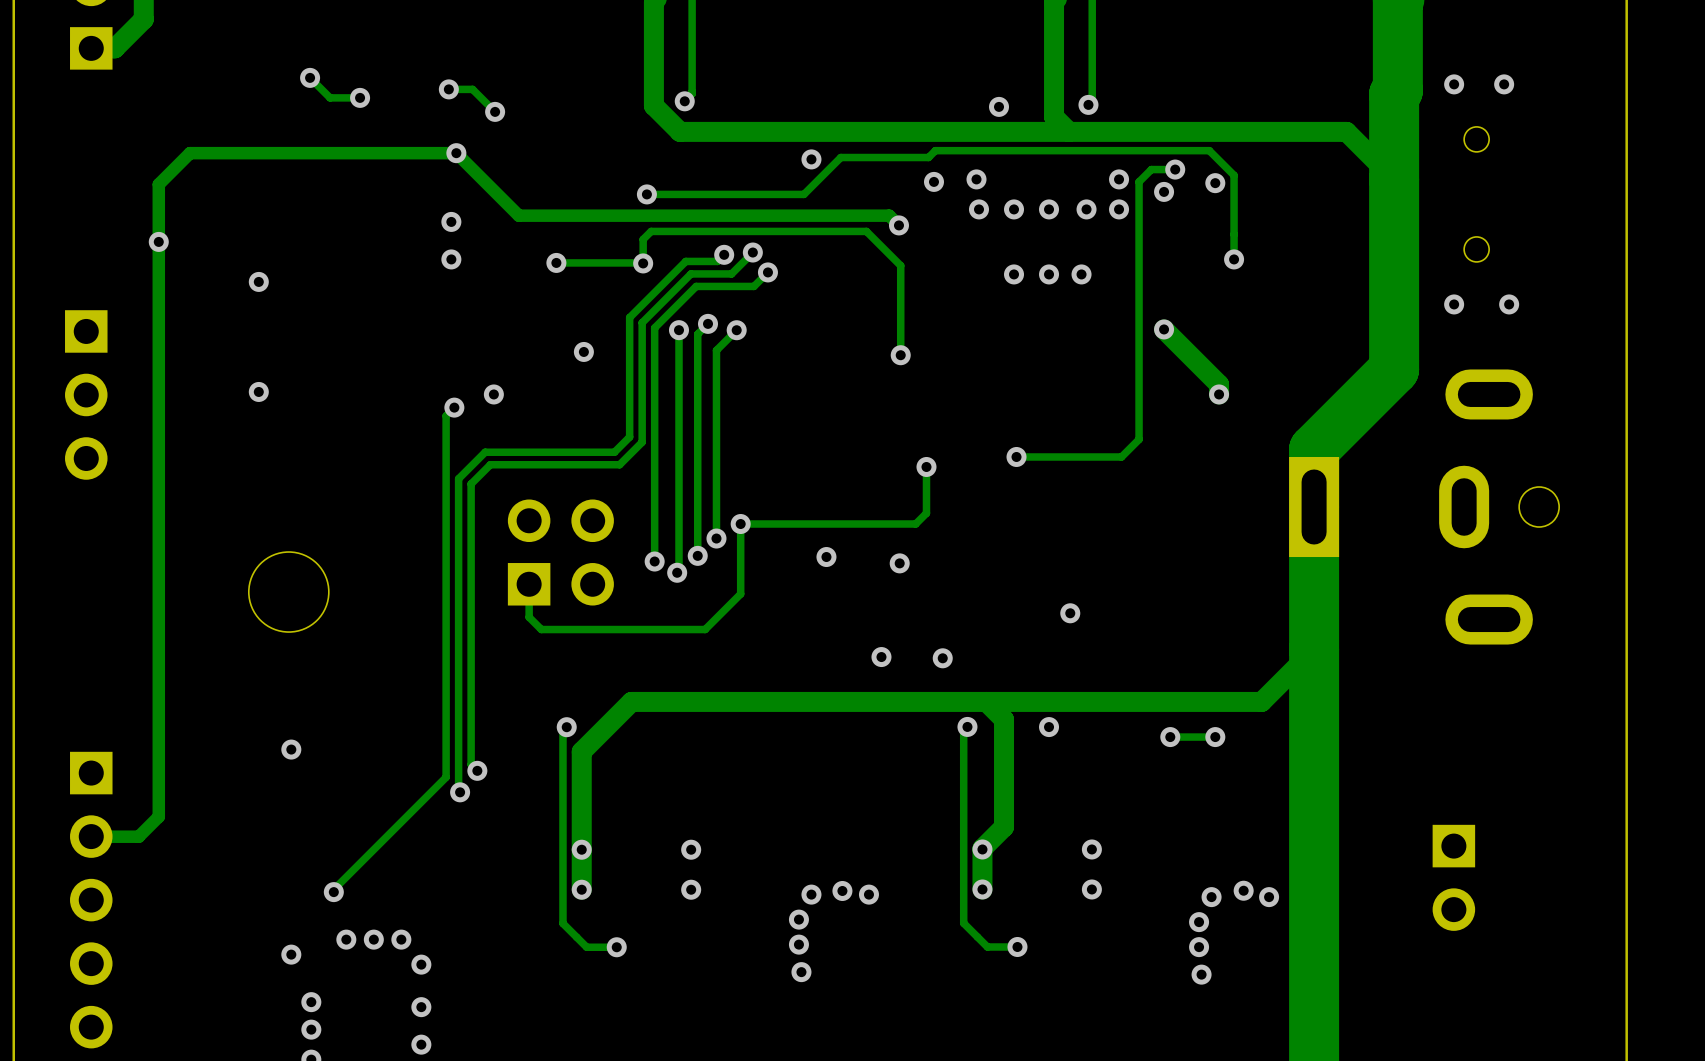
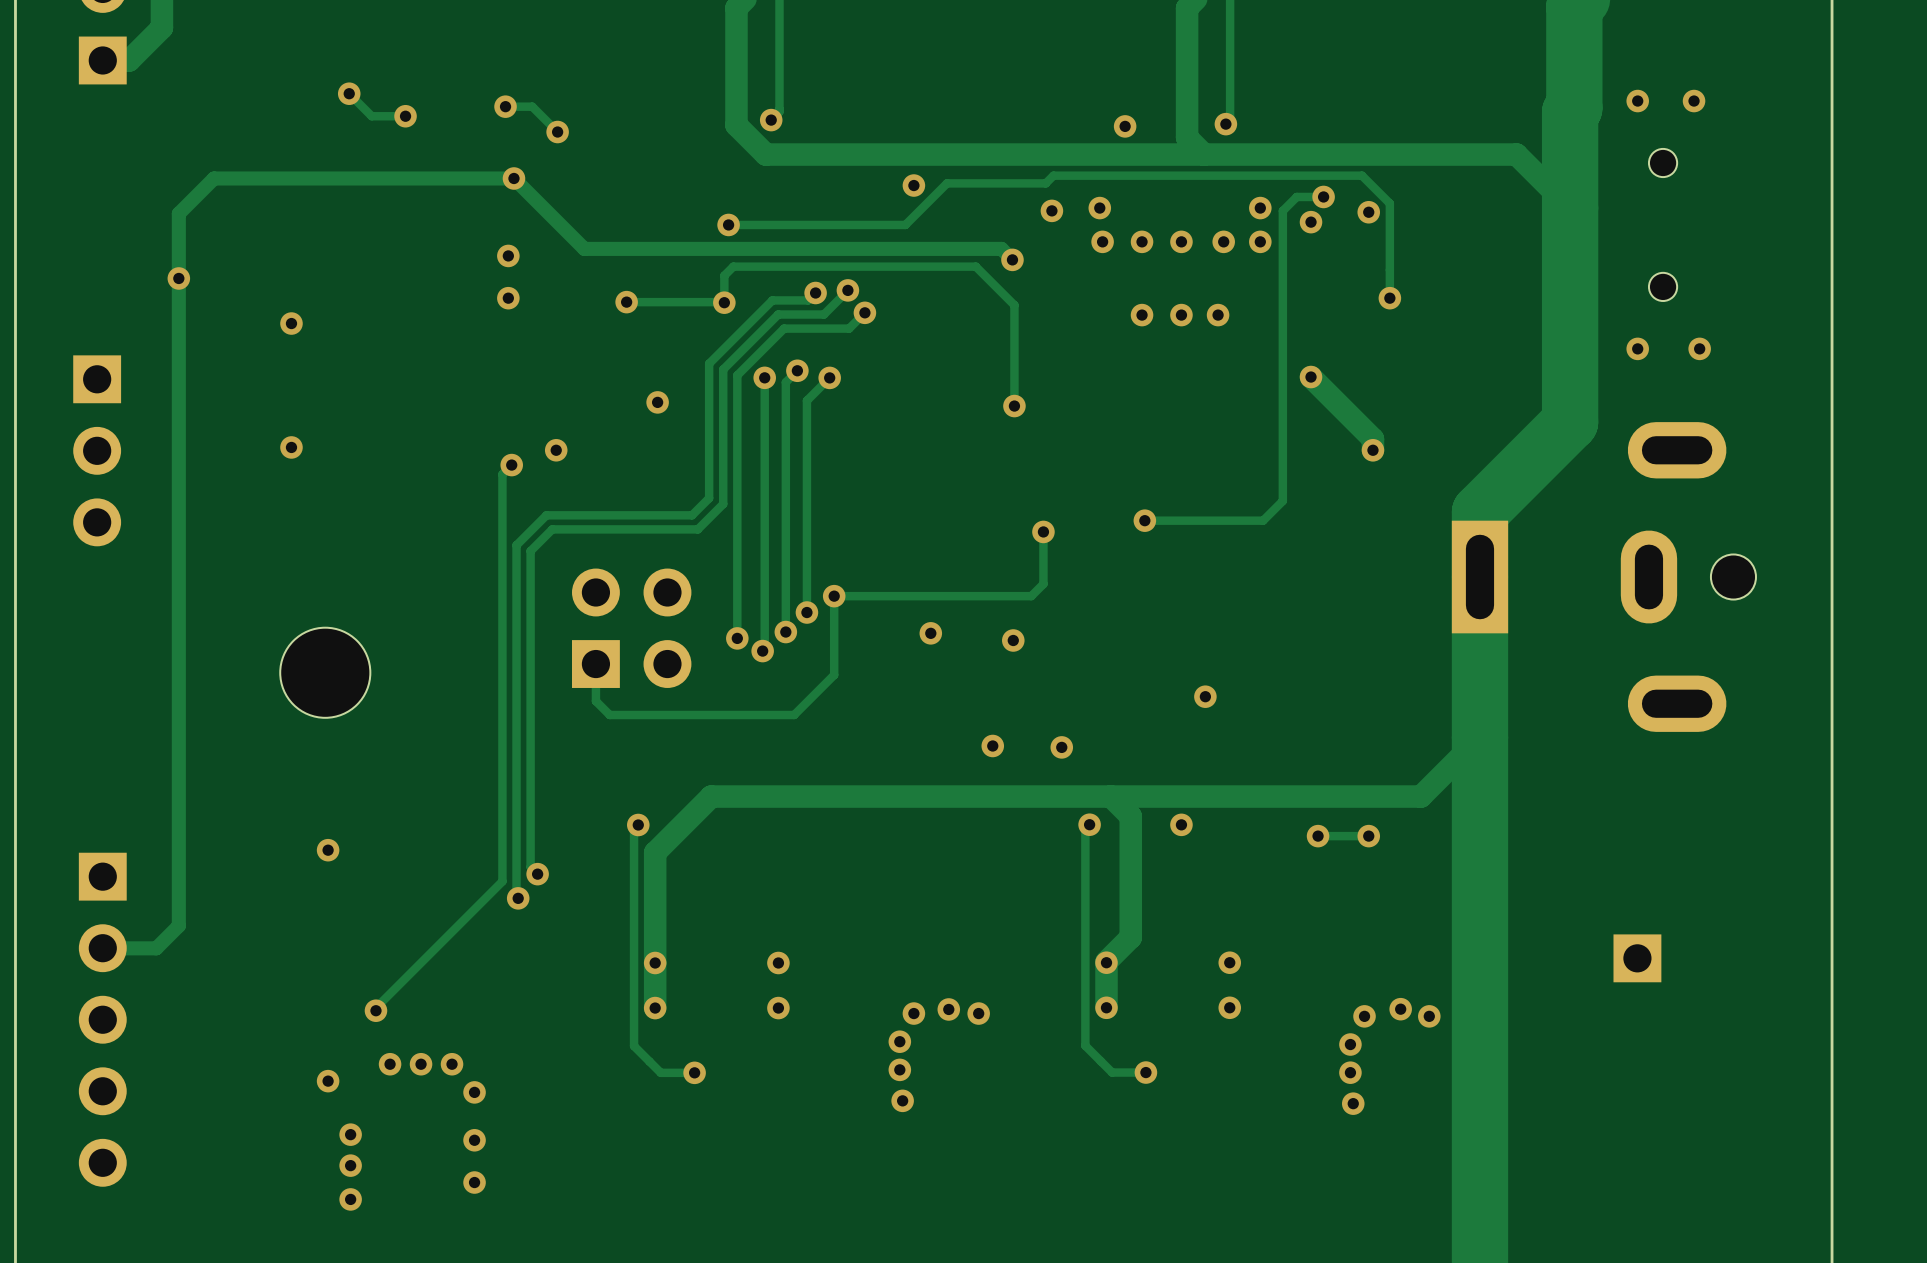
part: none -> (1637, 958)
part: (1453, 877) -> none

